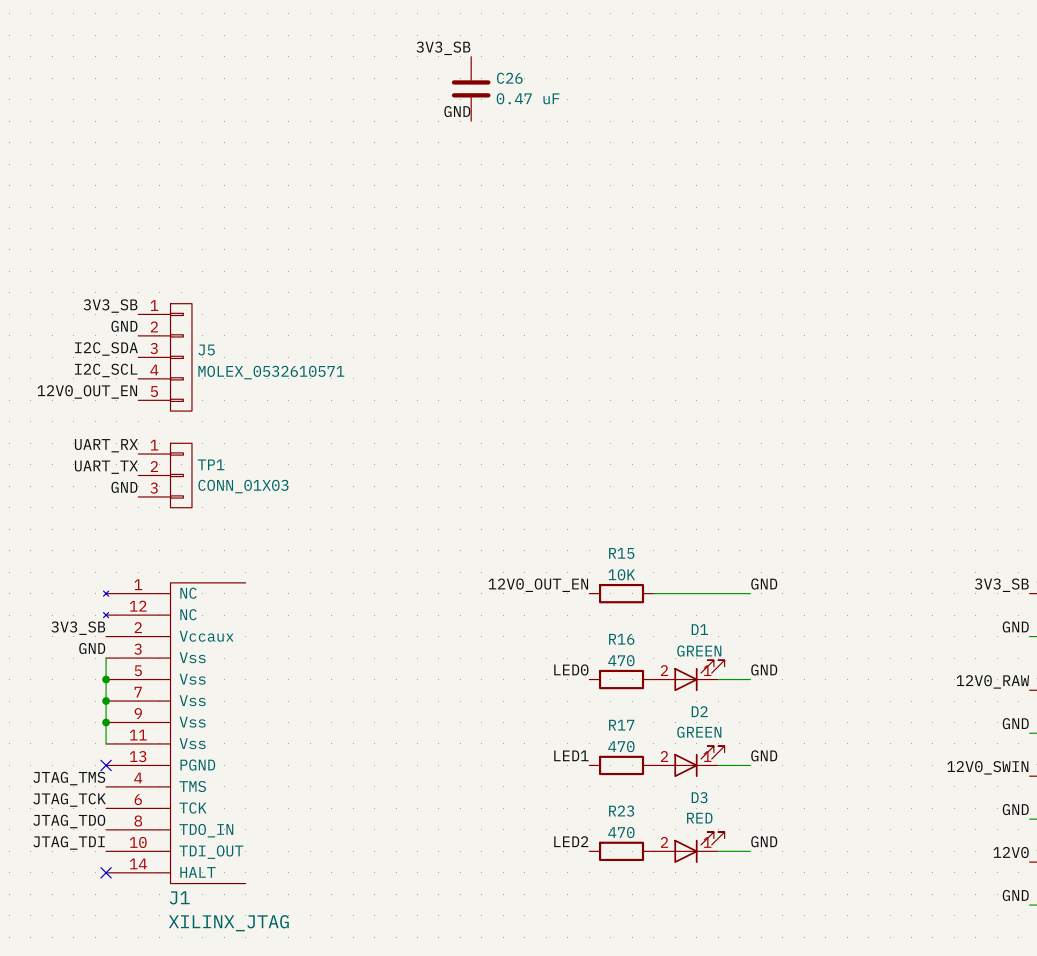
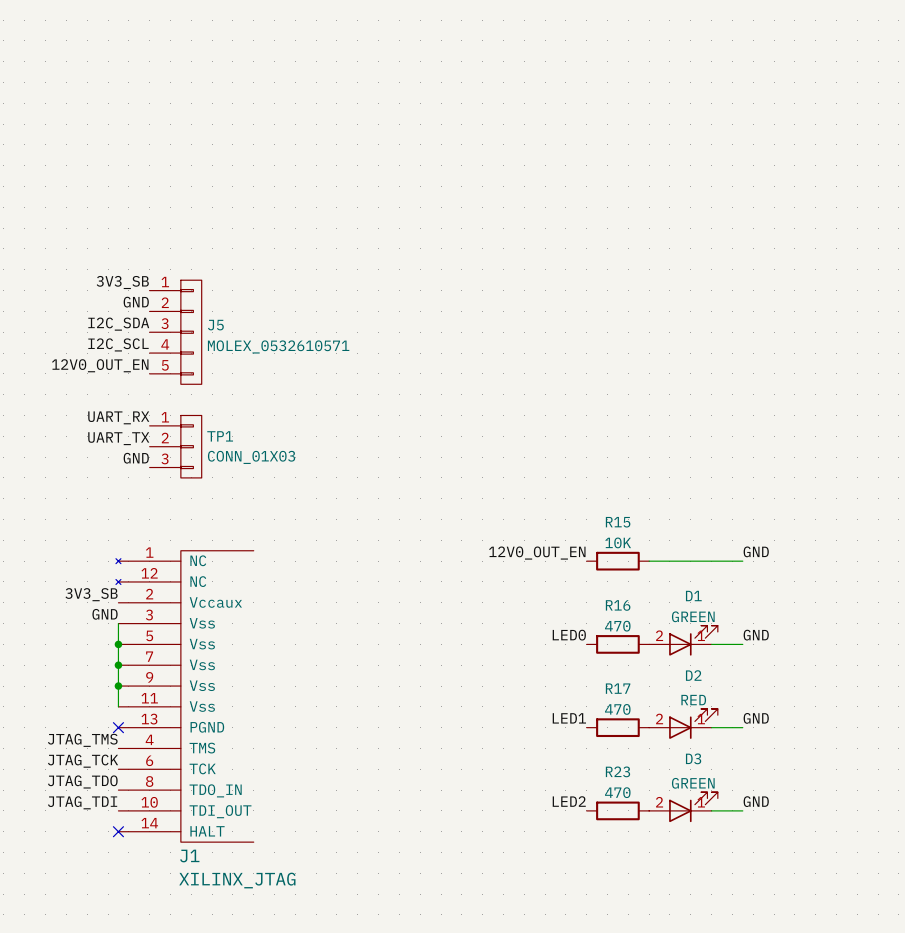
label: 3V3_SB (443, 48) -> none
C26: 0.47 uF (471, 88) -> none
label: GND (457, 111) -> none
D2 value: GREEN (699, 732) -> RED (693, 700)
D3 value: RED (699, 818) -> GREEN (693, 783)

